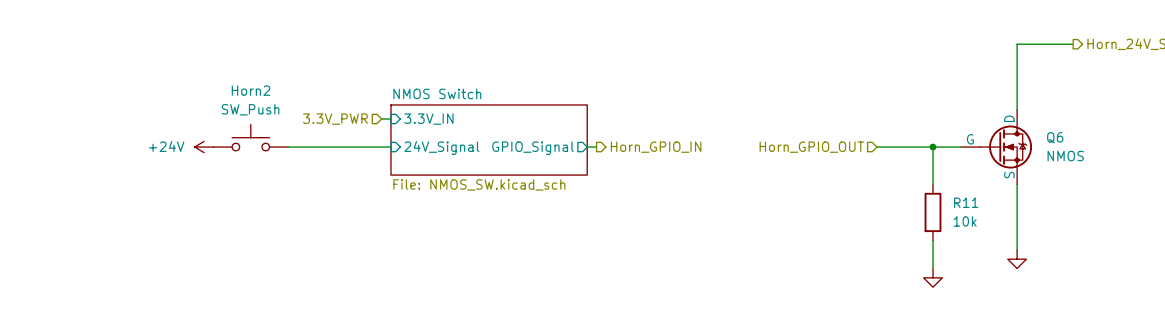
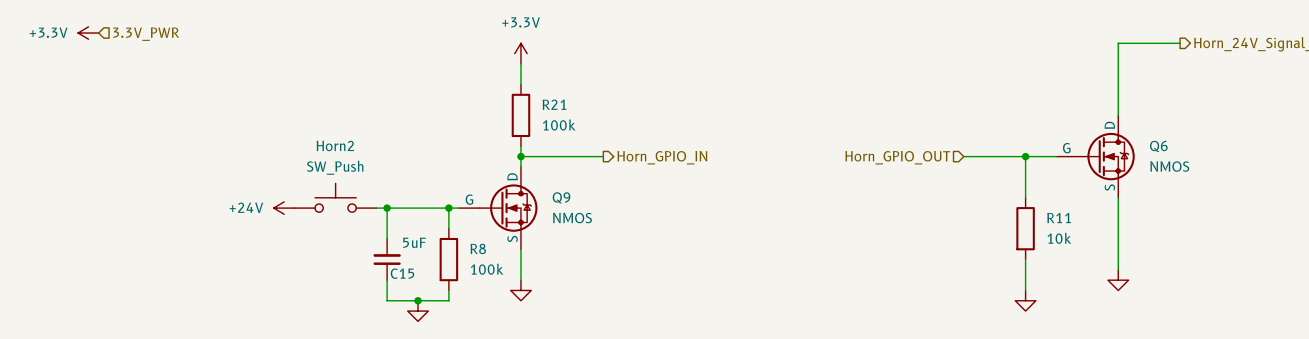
power symbol: none -> +3.3V (88, 33)
hierarchical label: none -> 3.3V_PWR (146, 34)
power symbol: none -> +3.3V (520, 53)
wire: none -> (520, 63) (520, 84)
R21: none -> 100k (520, 115)
hierarchical label: 3.3V_PWR (335, 119) -> none
wire: (381, 119) (390, 119) -> none
sheet pin: 3.3V_IN (428, 119) -> none
Horn2 position: (250, 137) -> (335, 197)
wire: none -> (520, 146) (520, 166)
sheet NMOS Switch: File: NMOS_SW.kicad_sch (489, 140) -> none
power symbol position: +24V (204, 147) -> +24V (284, 208)
wire: (288, 147) (390, 147) -> none
wire: none -> (520, 156) (603, 156)
junction: none -> (520, 156)
wire: (587, 147) (596, 147) -> none
hierarchical label position: Horn_GPIO_IN (656, 147) -> Horn_GPIO_IN (662, 157)
sheet pin: 24V_Signal (441, 148) -> none
sheet pin: GPIO_Signal (533, 148) -> none
wire: none -> (376, 208) (459, 208)
wire: none -> (387, 208) (387, 238)
junction: none -> (387, 208)
wire: none -> (448, 208) (448, 228)
junction: none -> (448, 208)
Q9: none -> NMOS (498, 208)
wire: none -> (520, 249) (520, 280)
C15: none -> 5uF (387, 259)
R8: none -> 100k (448, 259)
wire: none -> (387, 280) (387, 300) (448, 300) (448, 290)
power symbol: none -> (520, 290)
junction: none -> (418, 300)
power symbol: none -> (418, 311)

